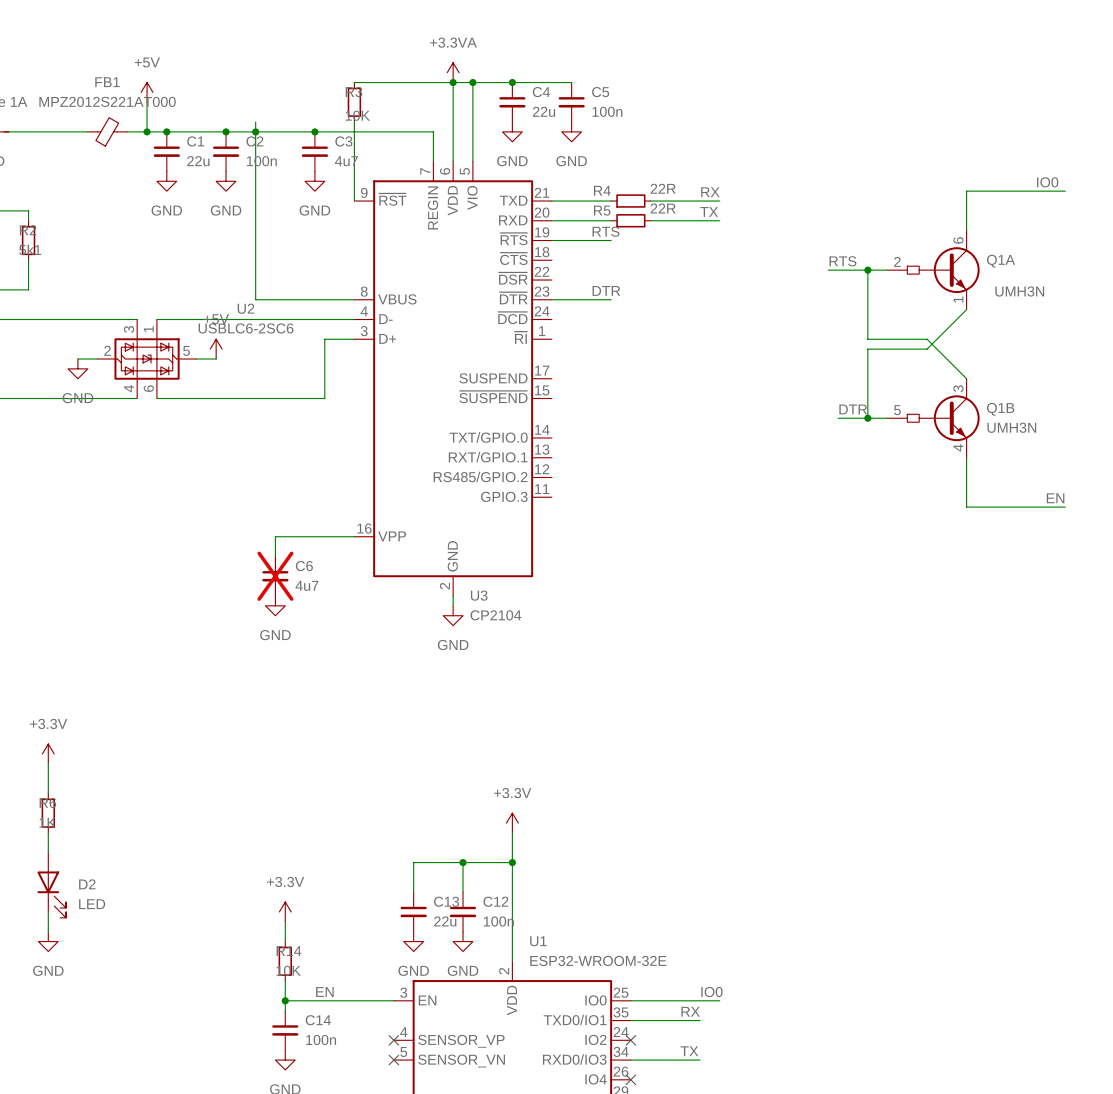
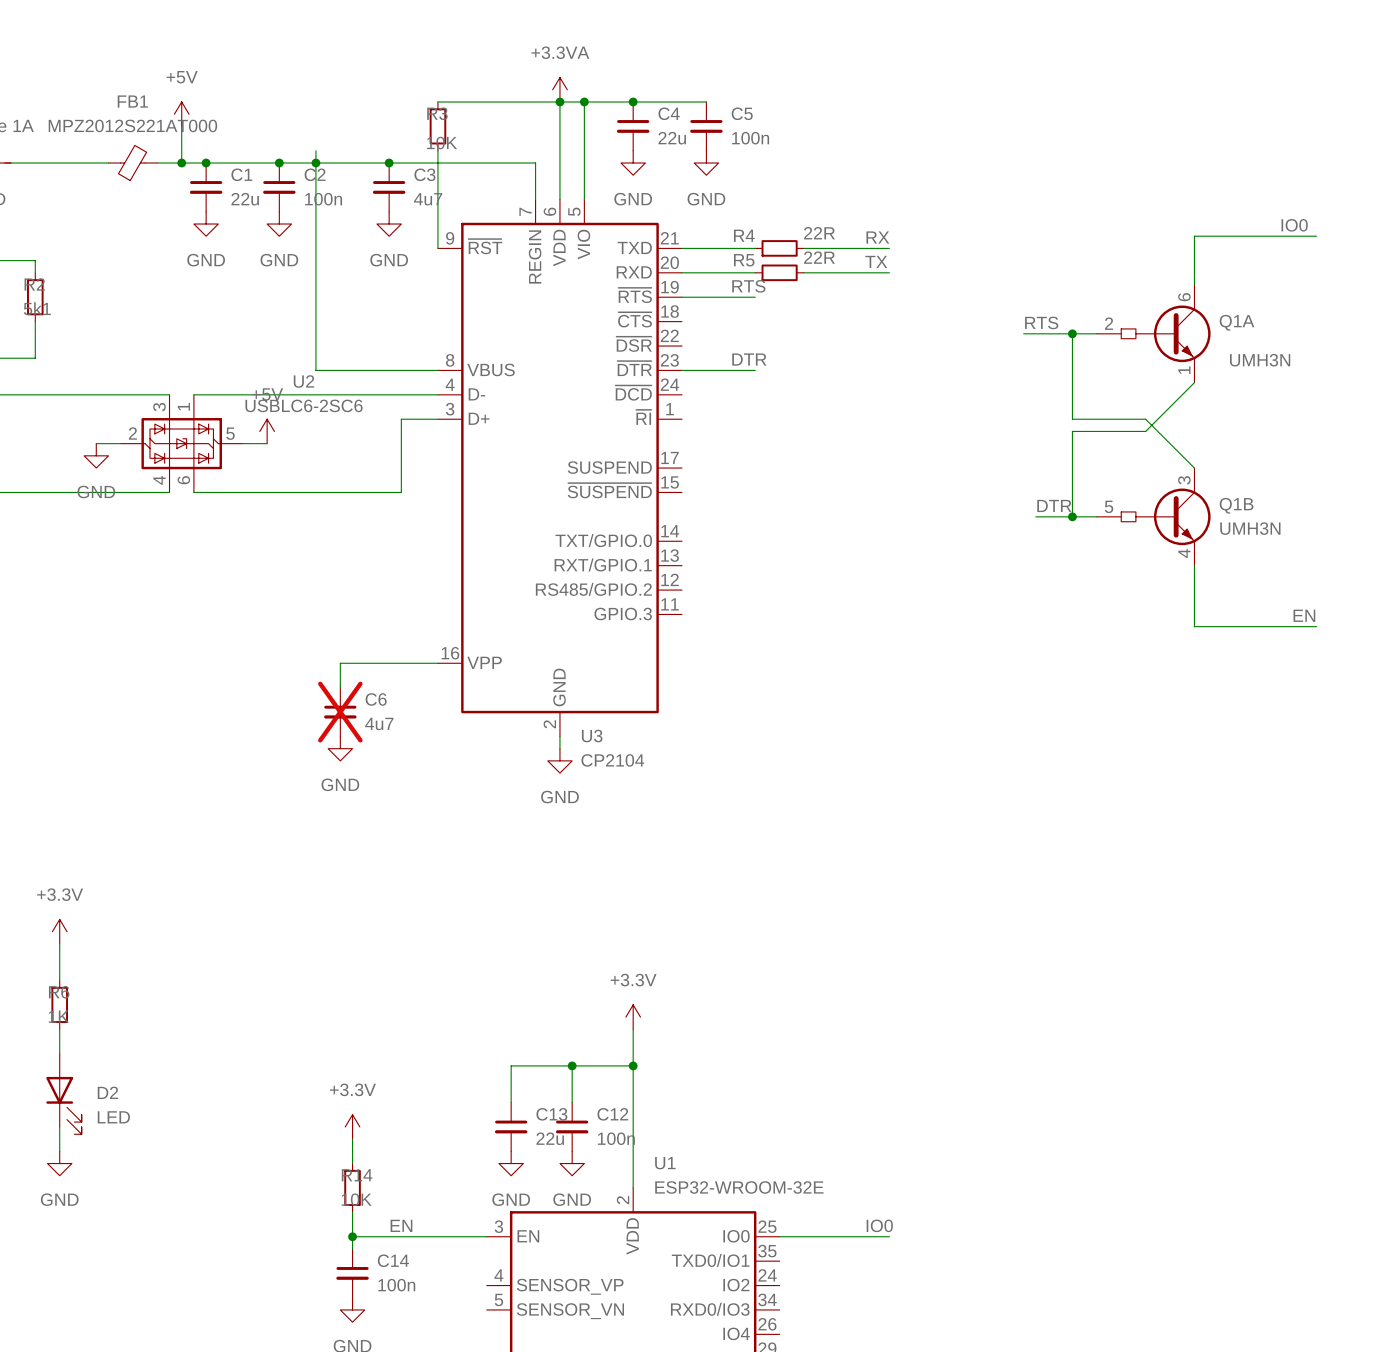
label: RX (690, 1011) -> none
wire: (630, 1020) (699, 1020) -> none
no-connect mark: (393, 1040) -> none
no-connect mark: (630, 1040) -> none
label: TX (689, 1051) -> none
no-connect mark: (393, 1060) -> none
wire: (630, 1060) (699, 1060) -> none
no-connect mark: (630, 1079) -> none

